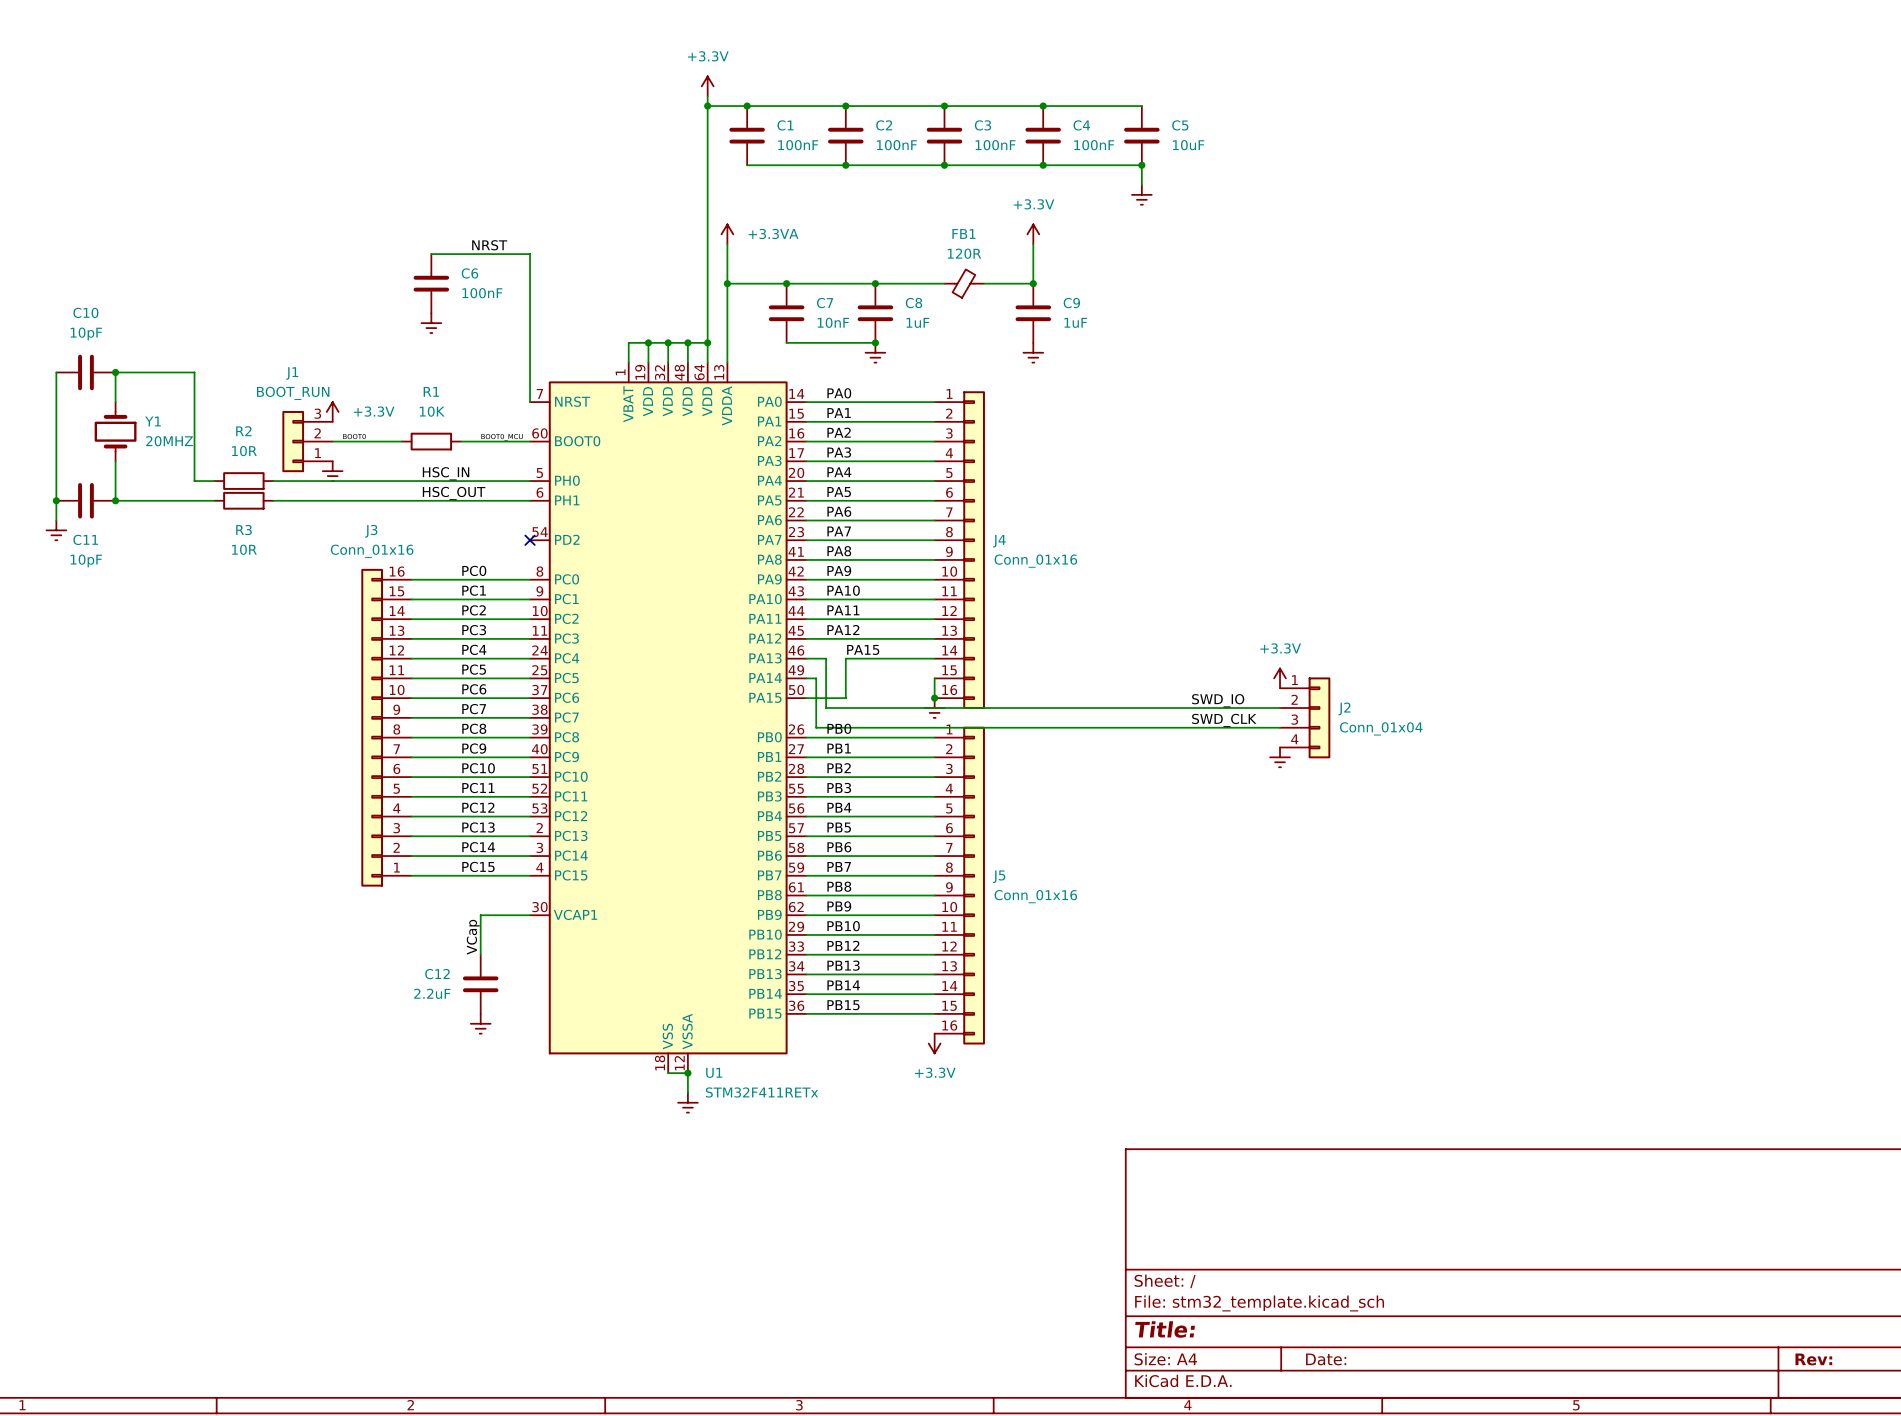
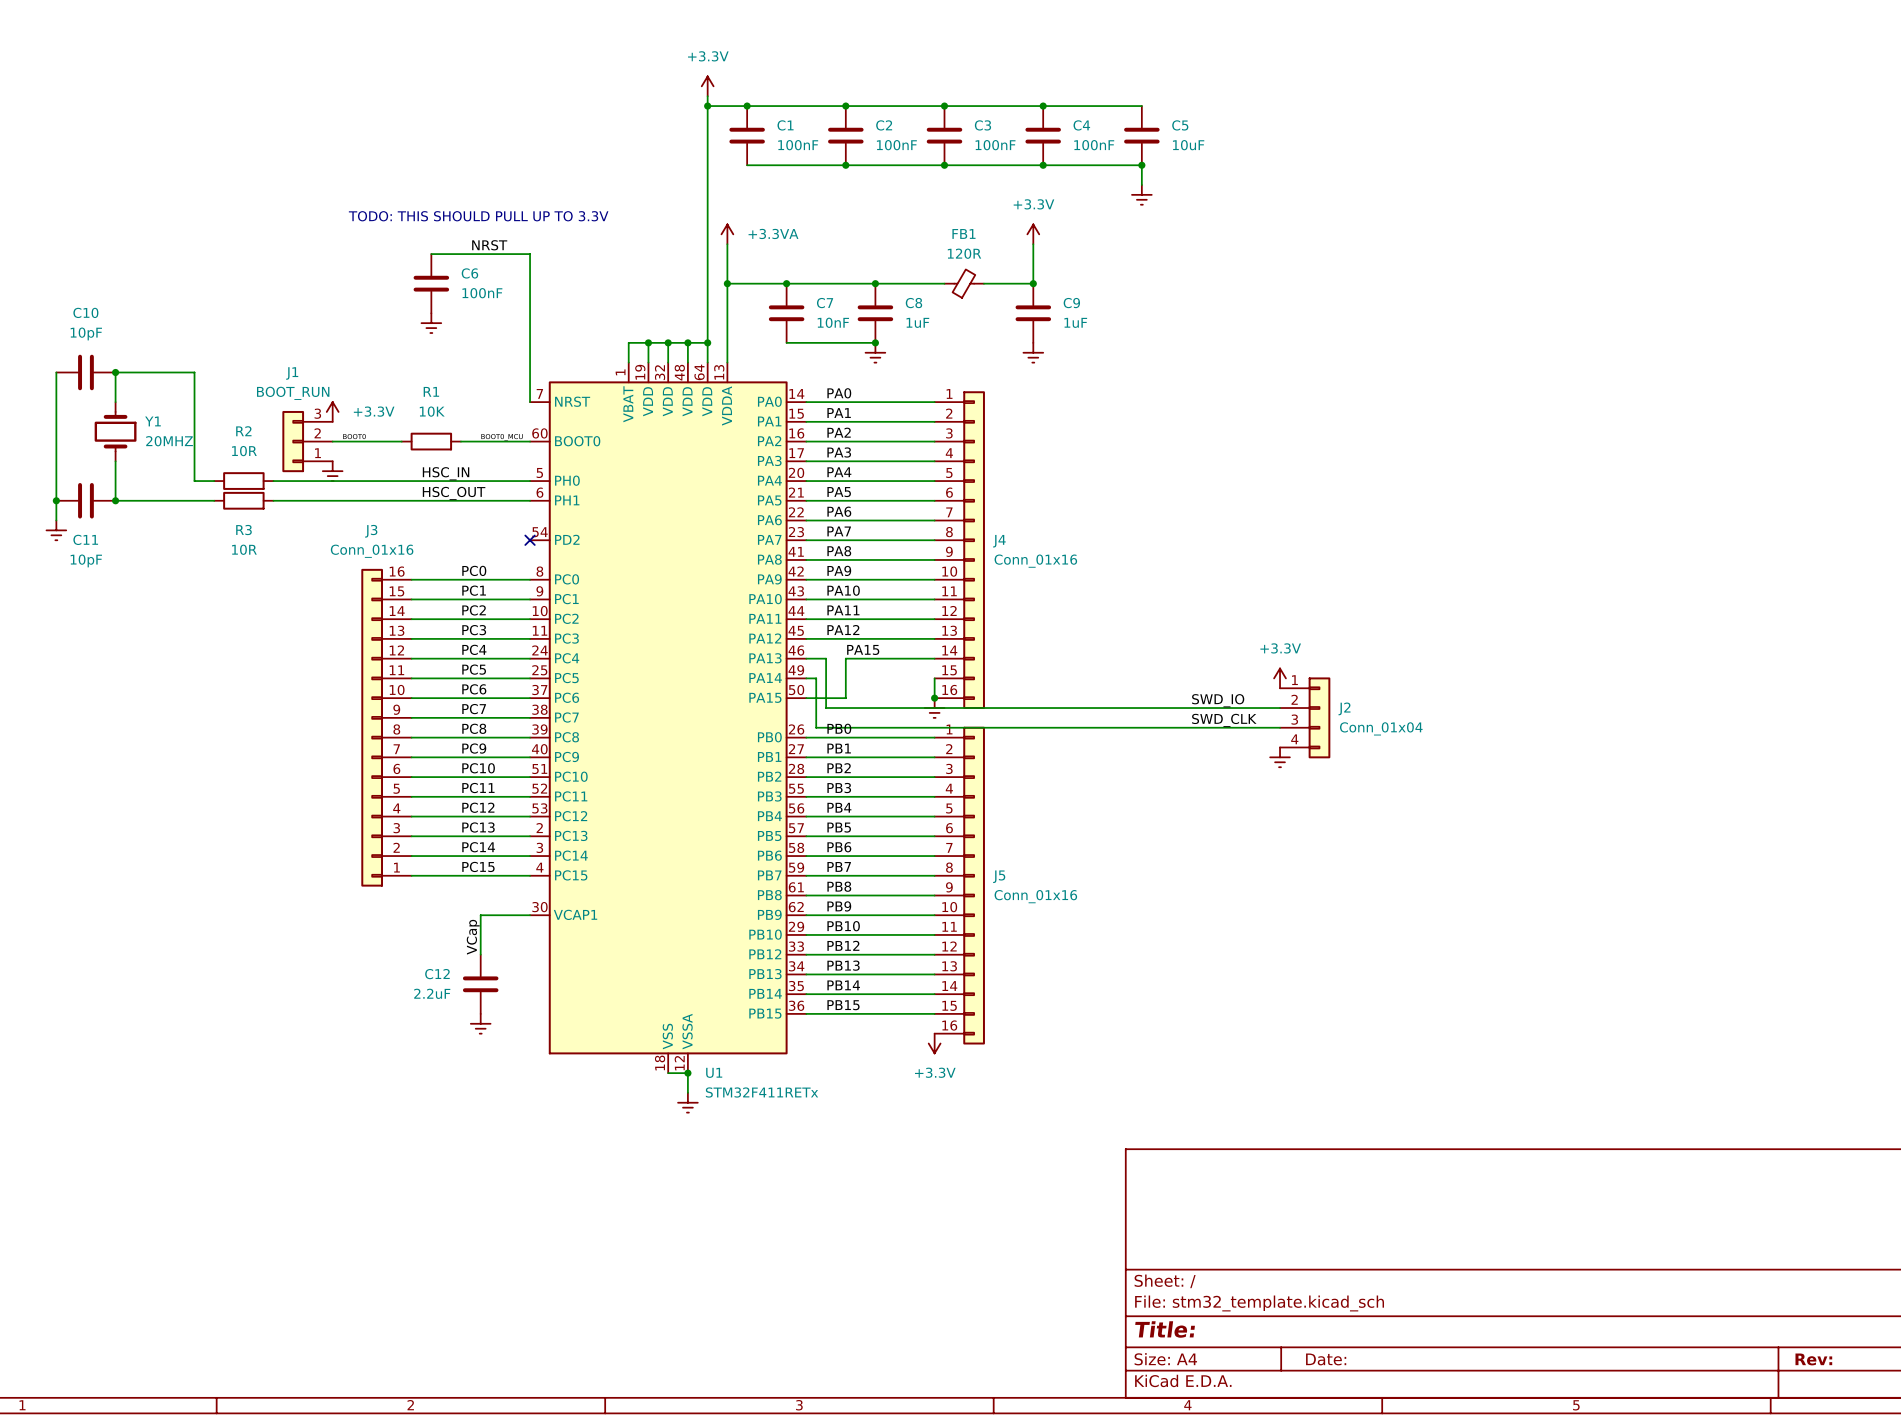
text: none -> TODO: THIS SHOULD PULL UP TO 3.3V (478, 216)

